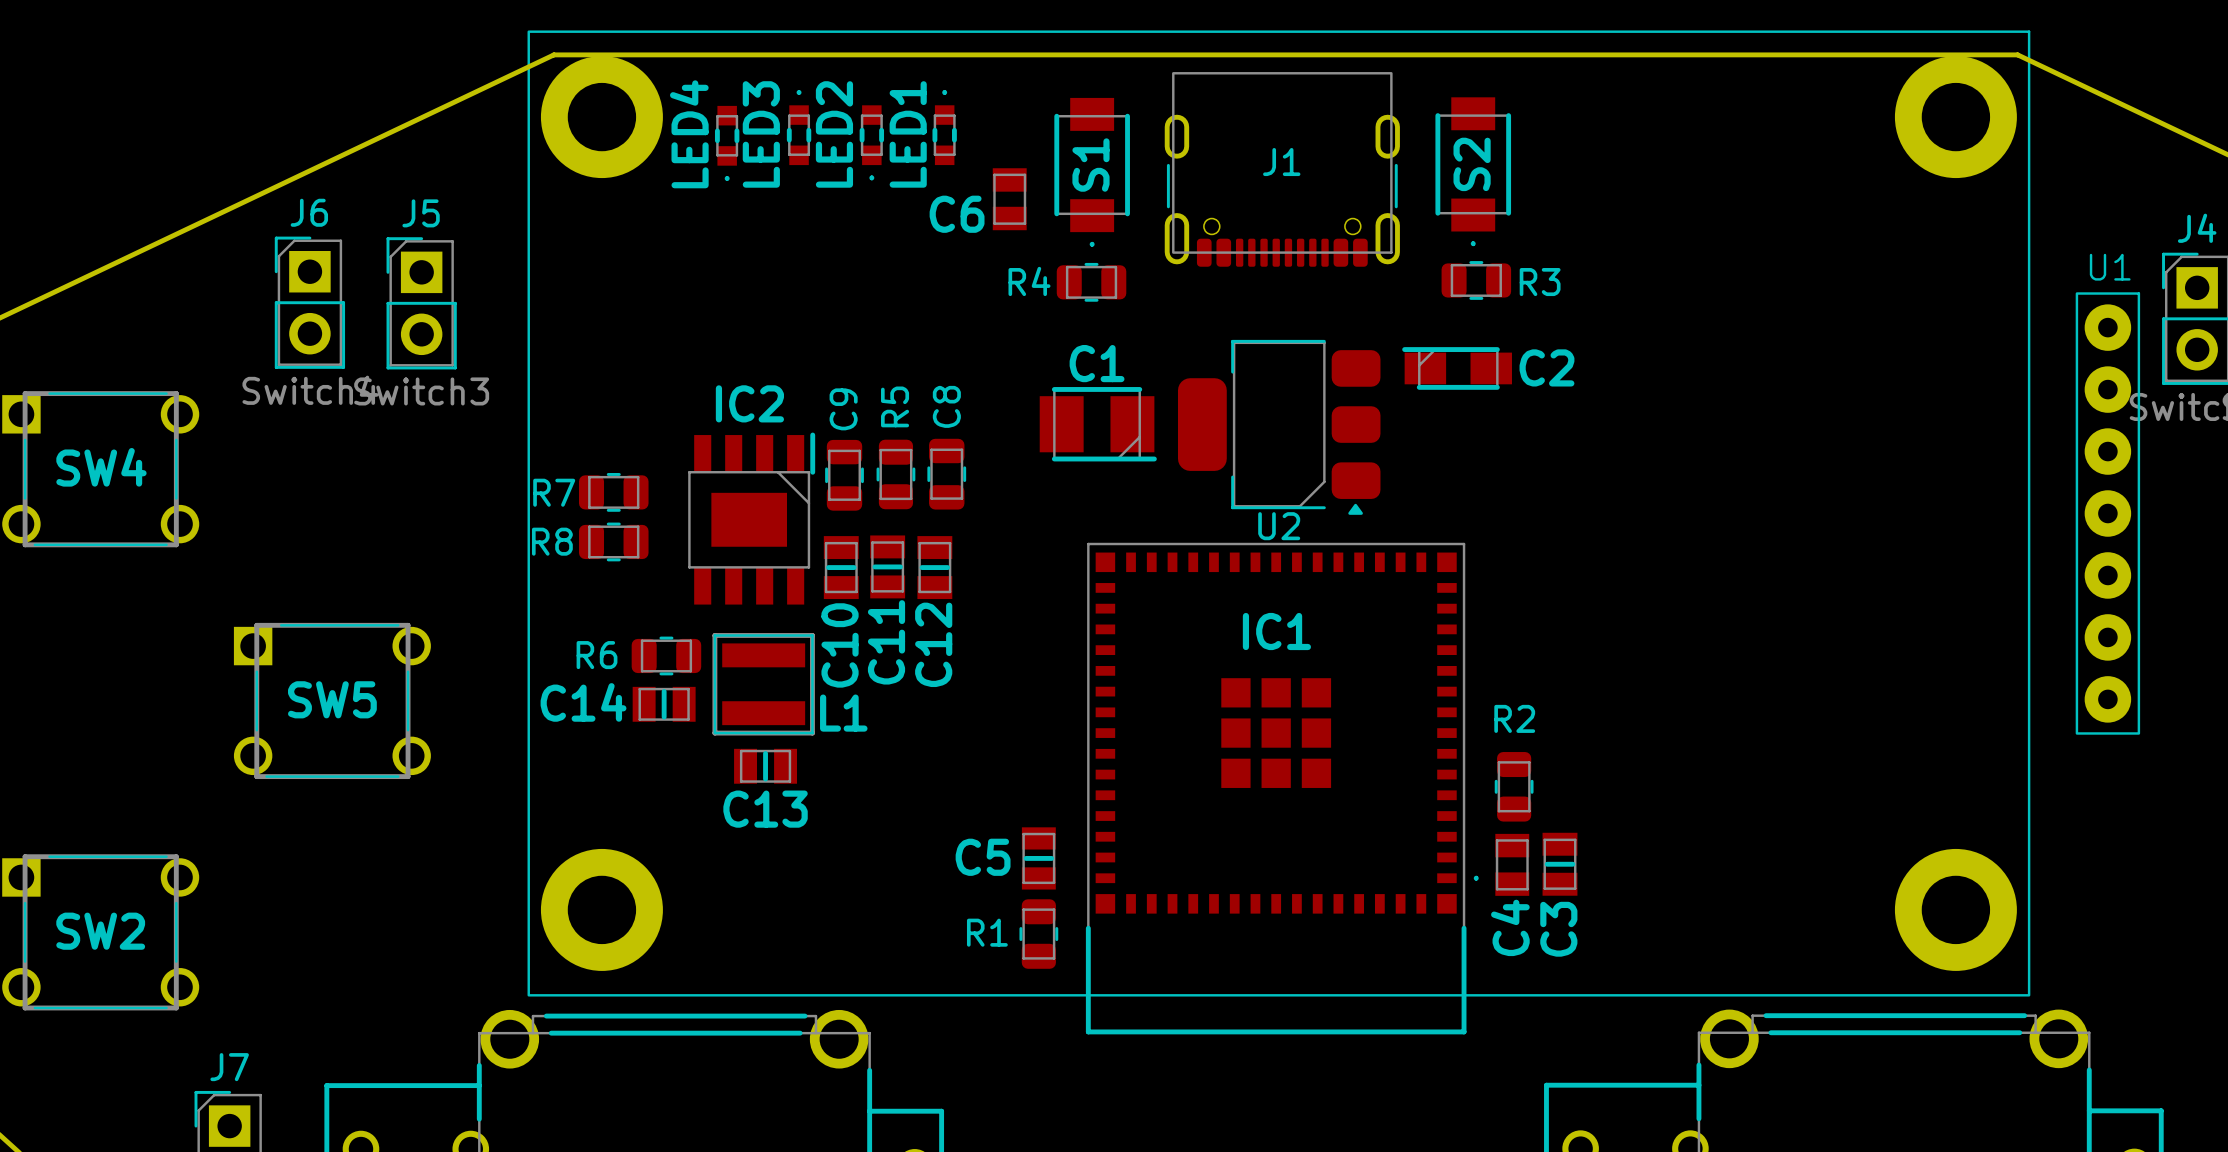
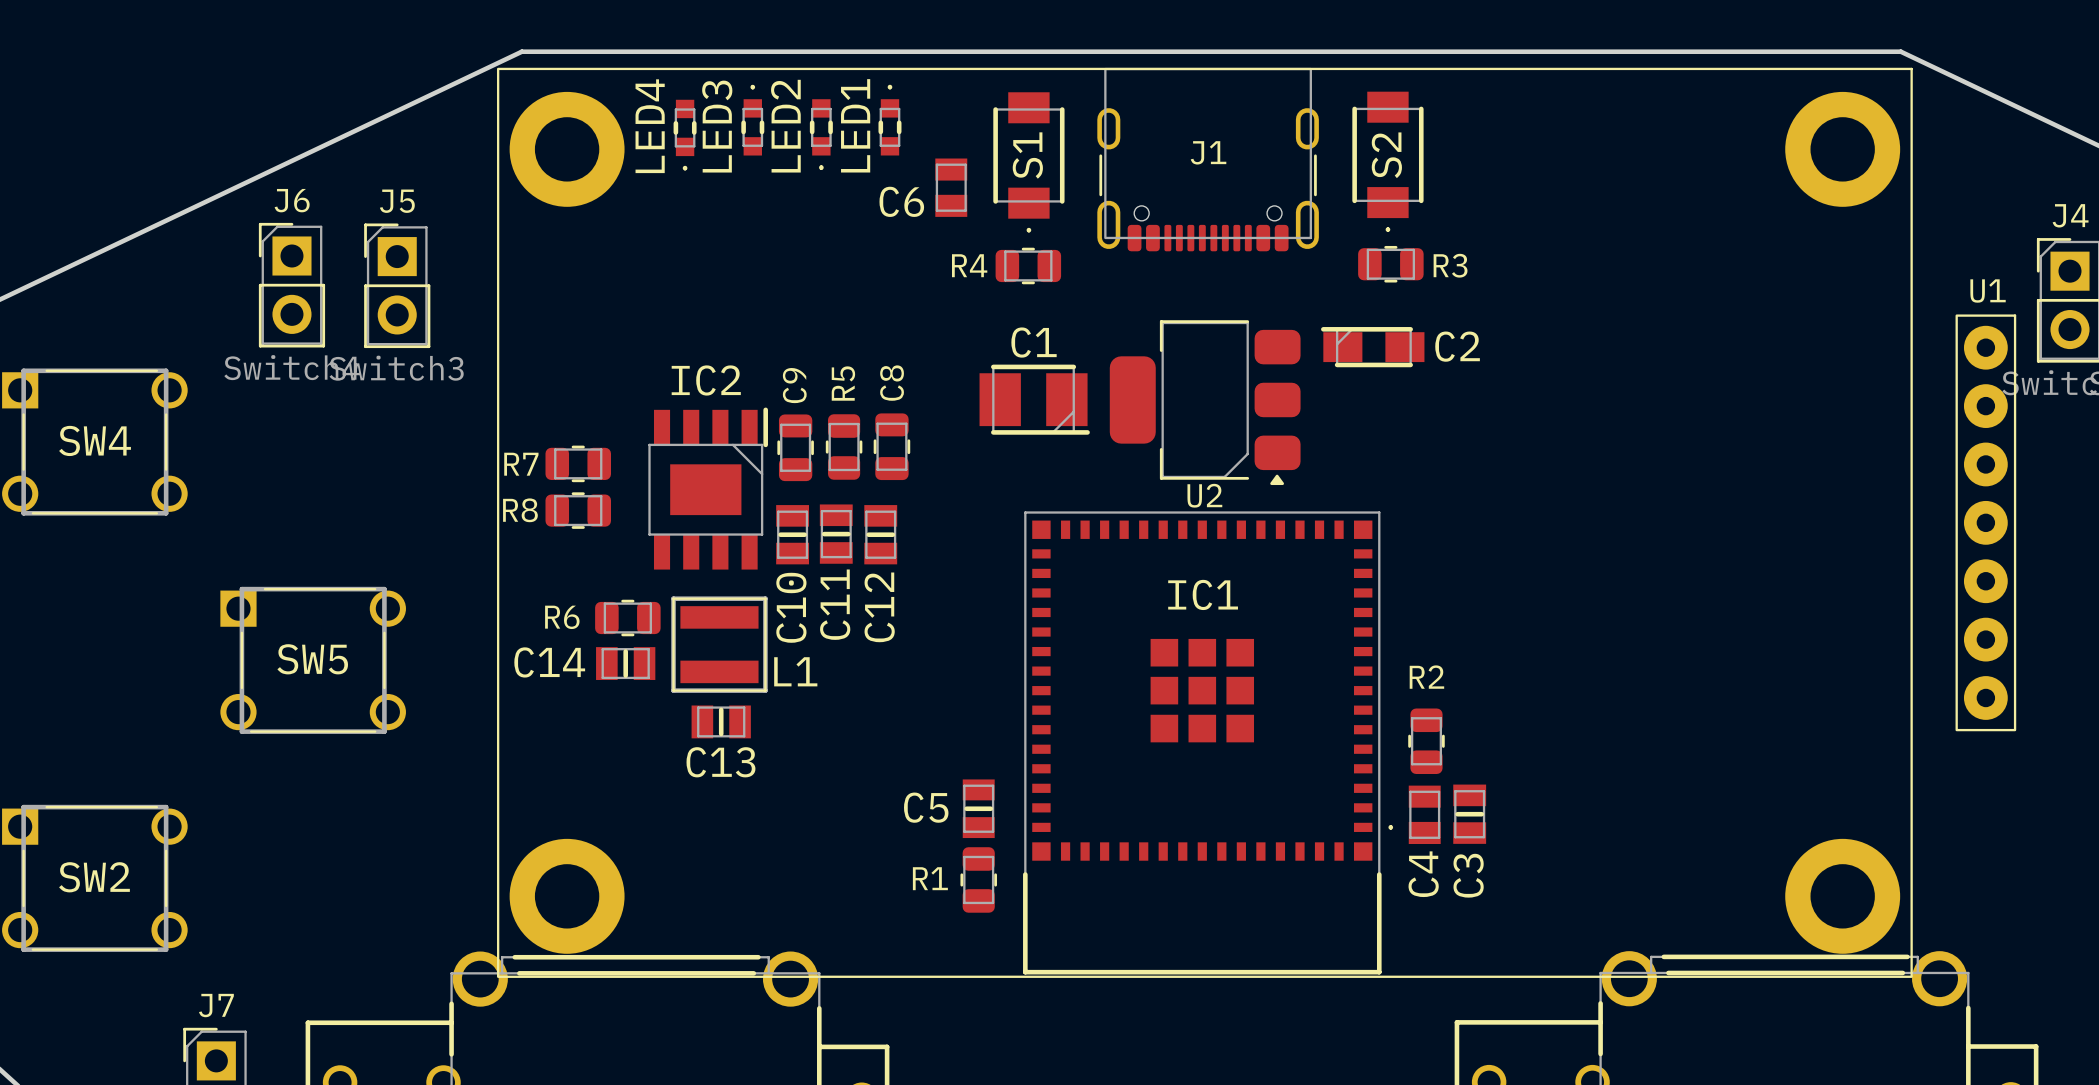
U1 position: (1333, 513) -> (1256, 522)

